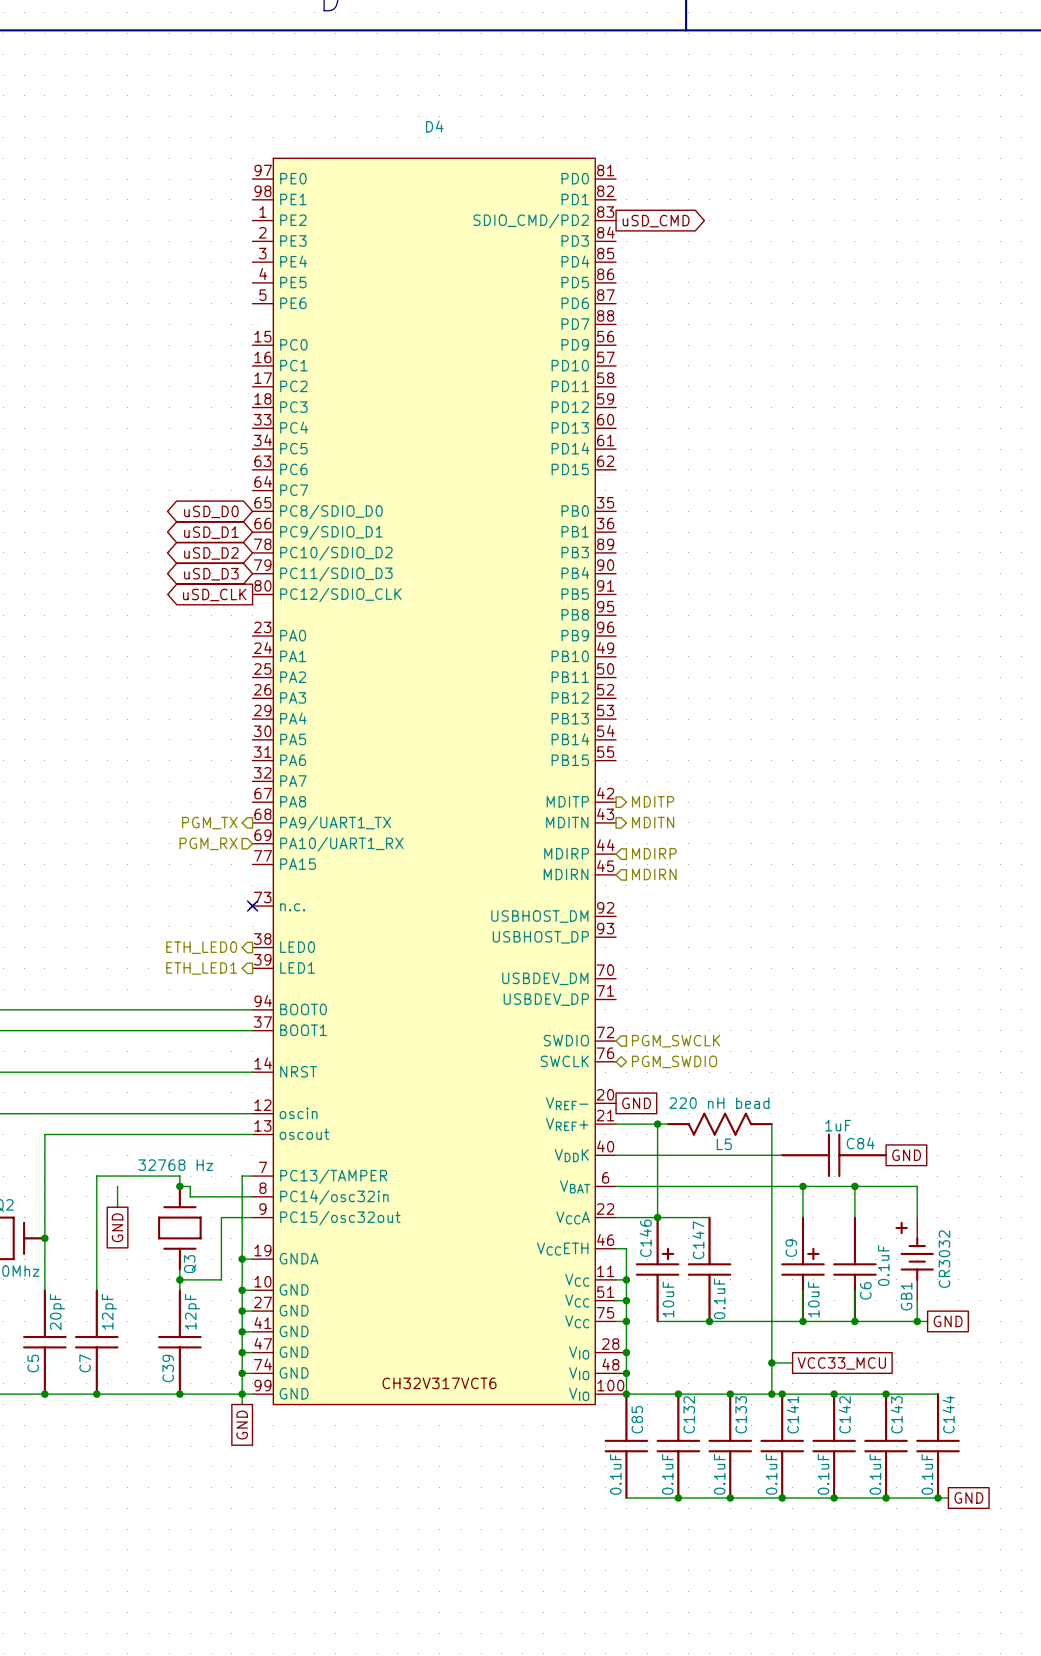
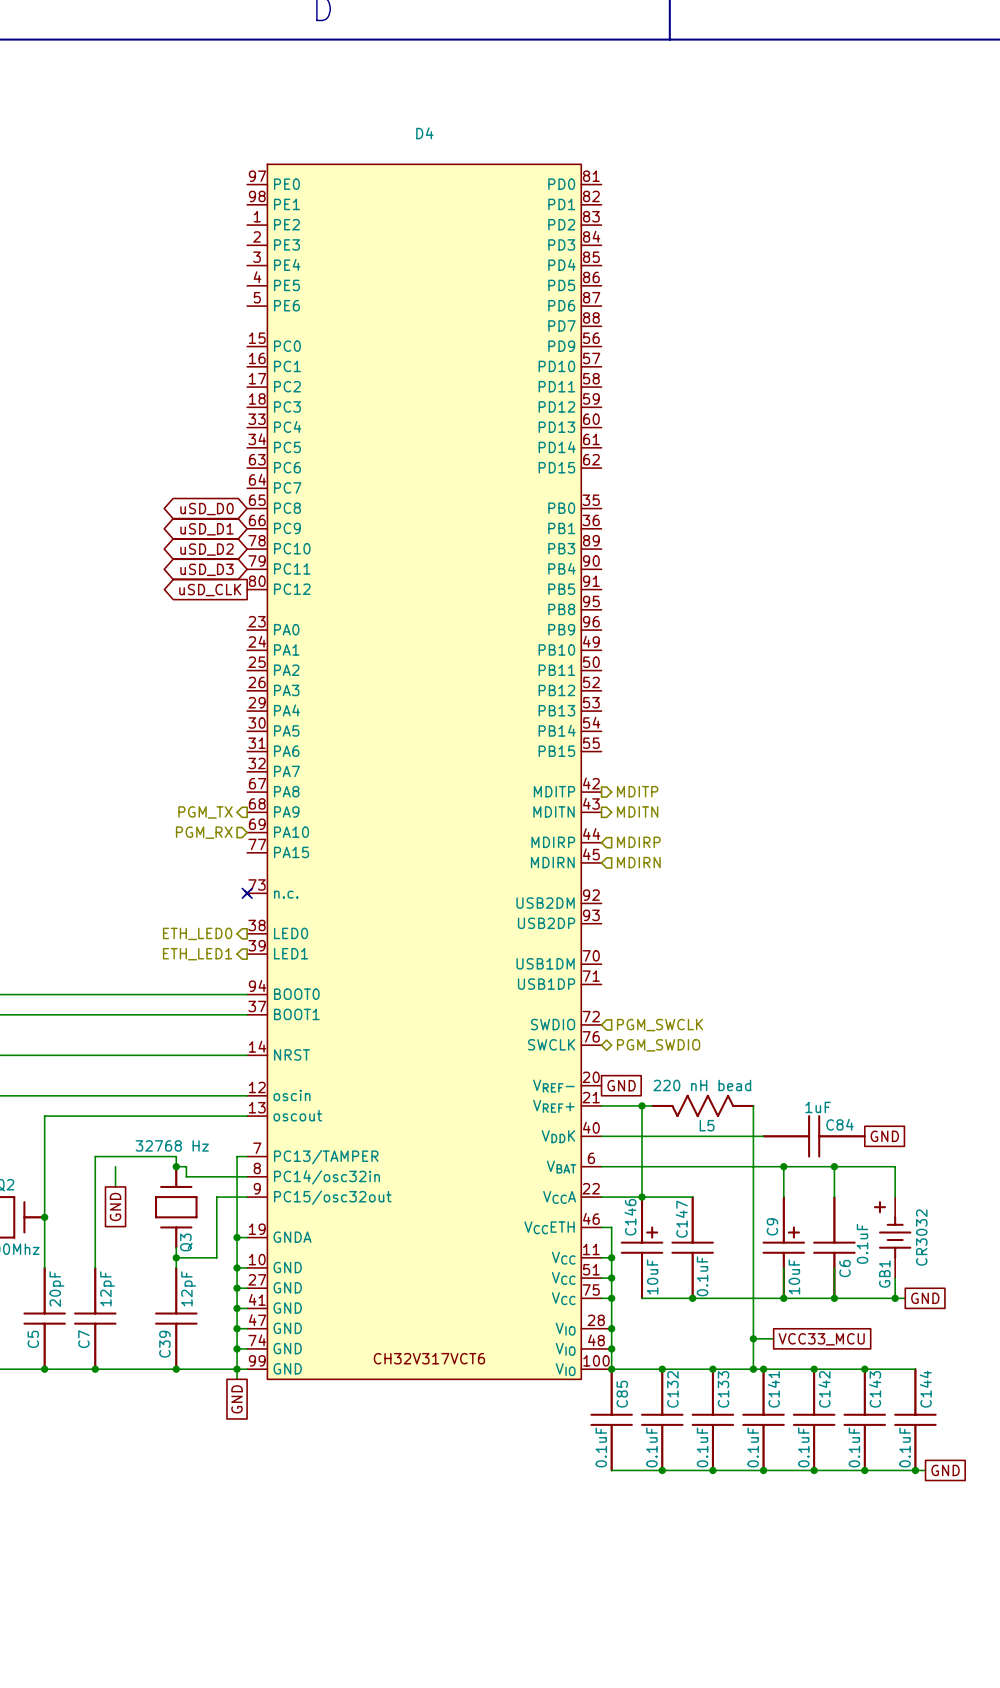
D4 symbol: [250, 158, 627, 1405] -> [244, 164, 612, 1380]
global label: uSD_CMD (656, 221) -> none

